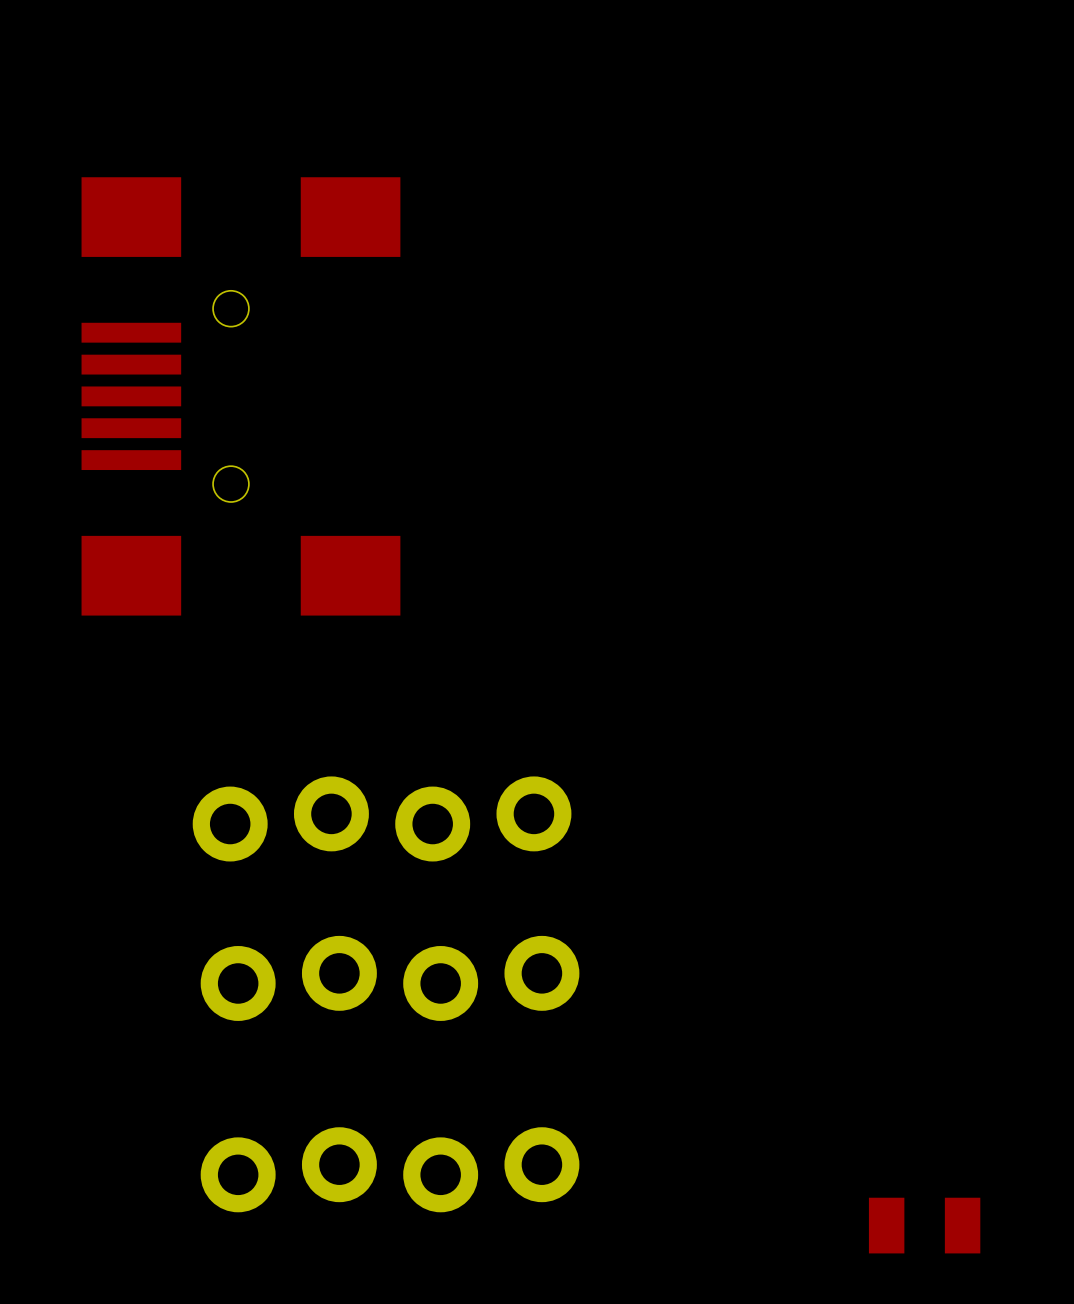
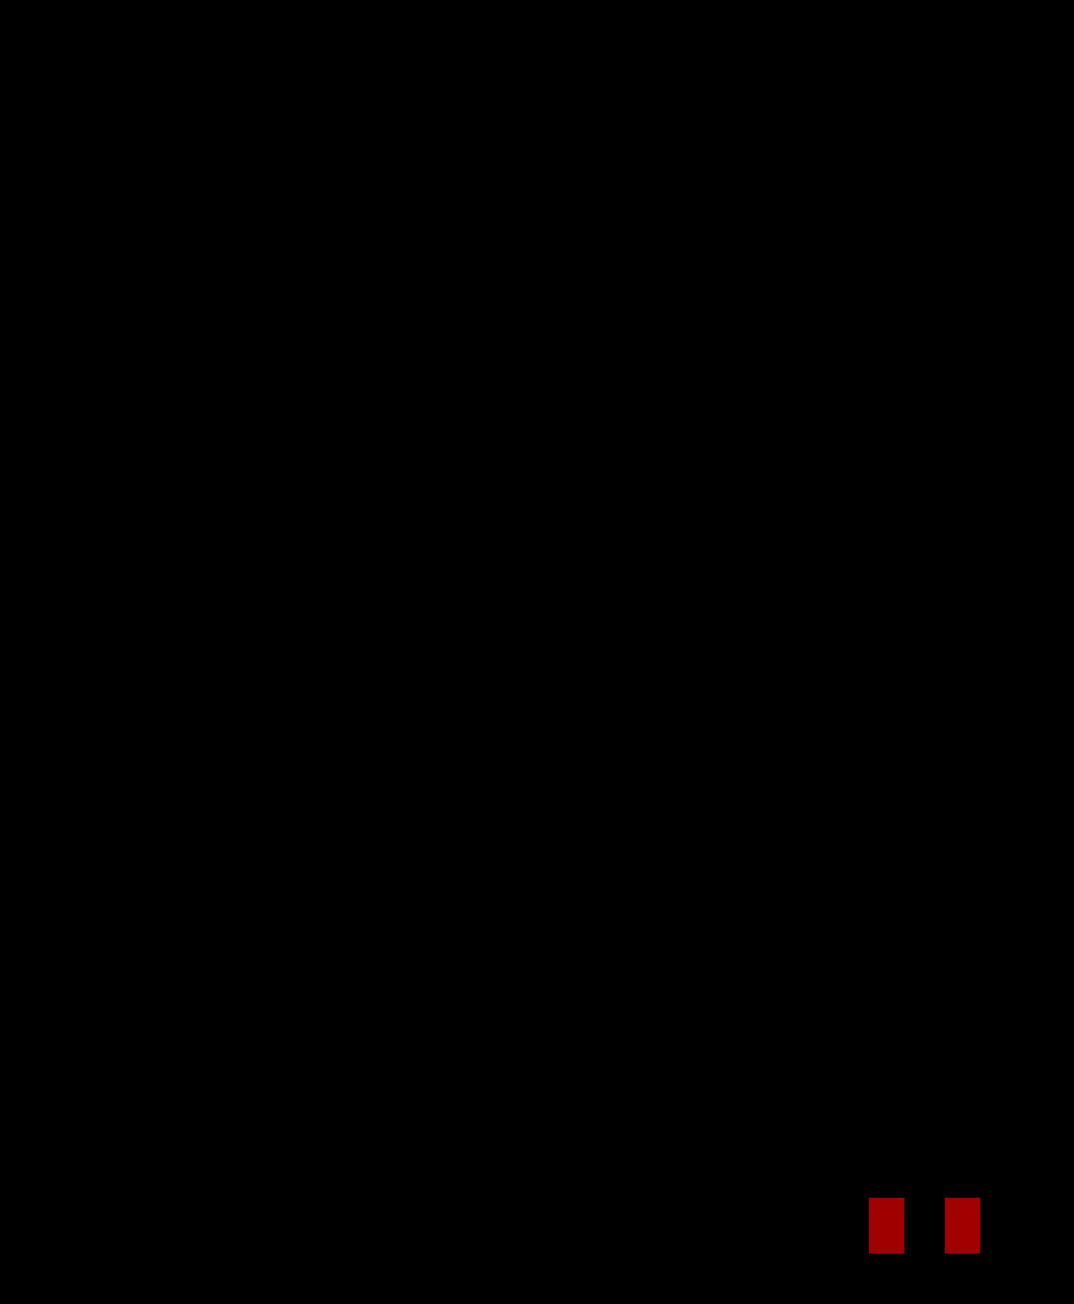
part: (240, 396) -> none
part: (382, 818) -> none
part: (390, 978) -> none
part: (390, 1169) -> none

